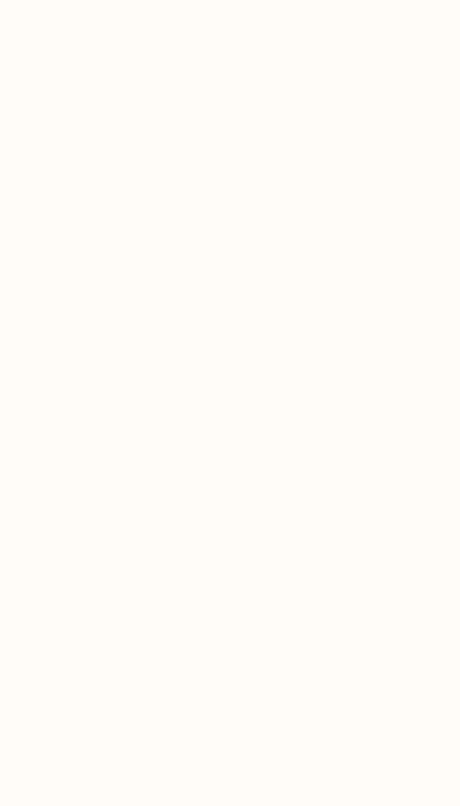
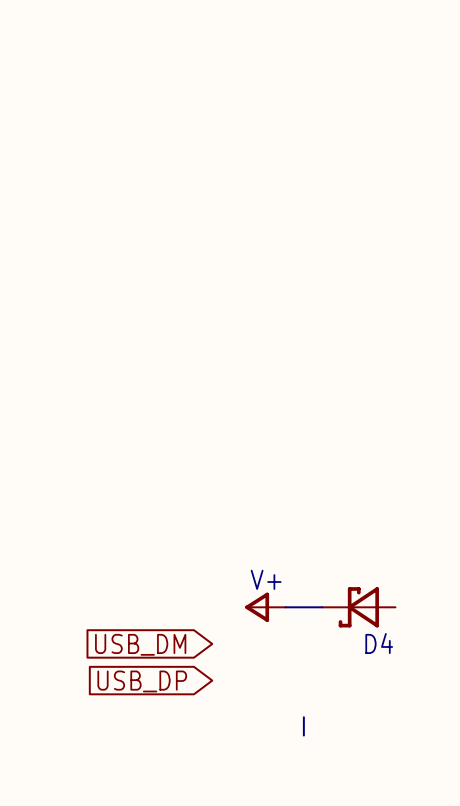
power symbol: none -> V+ (265, 607)
wire: none -> (285, 607) (322, 607)
D4: none -> (358, 607)
global label: none -> USB_DM (140, 644)
global label: none -> USB_DP (142, 681)
wire: none -> (303, 717) (303, 735)

